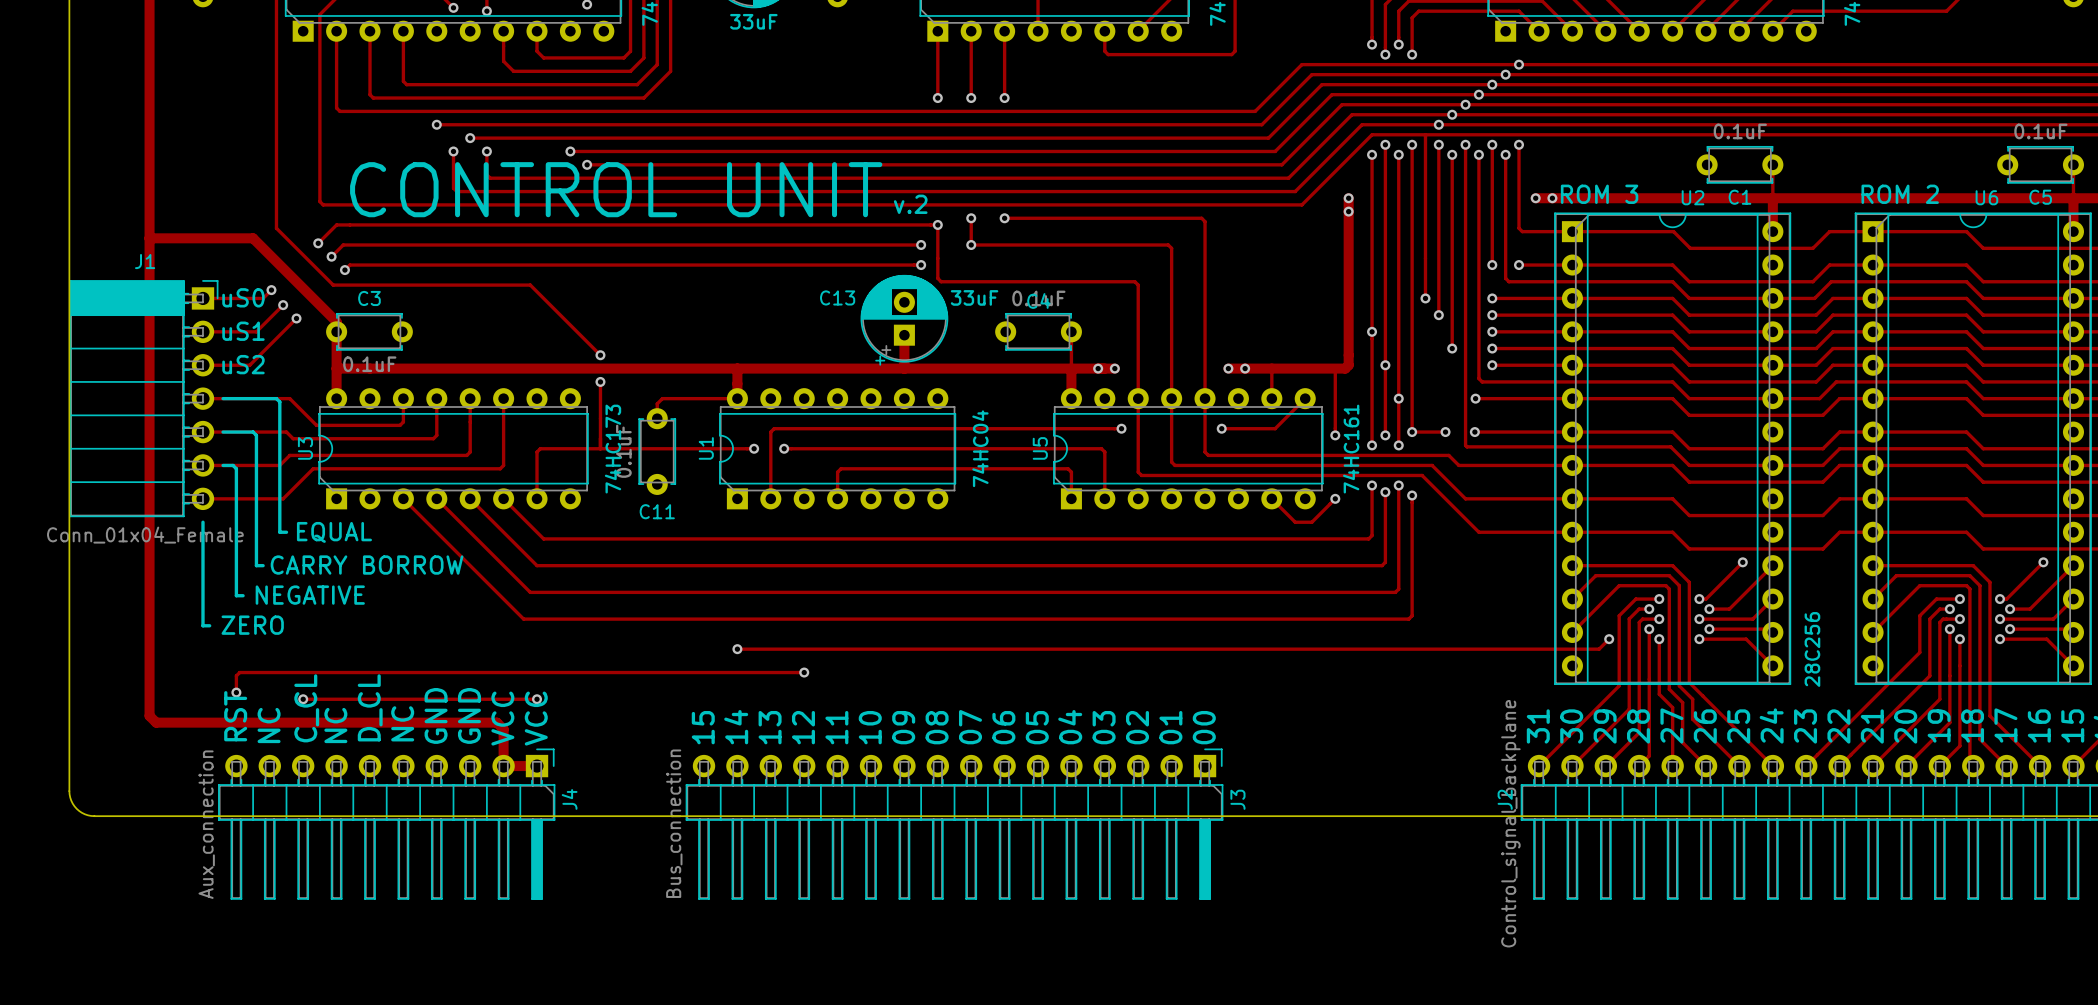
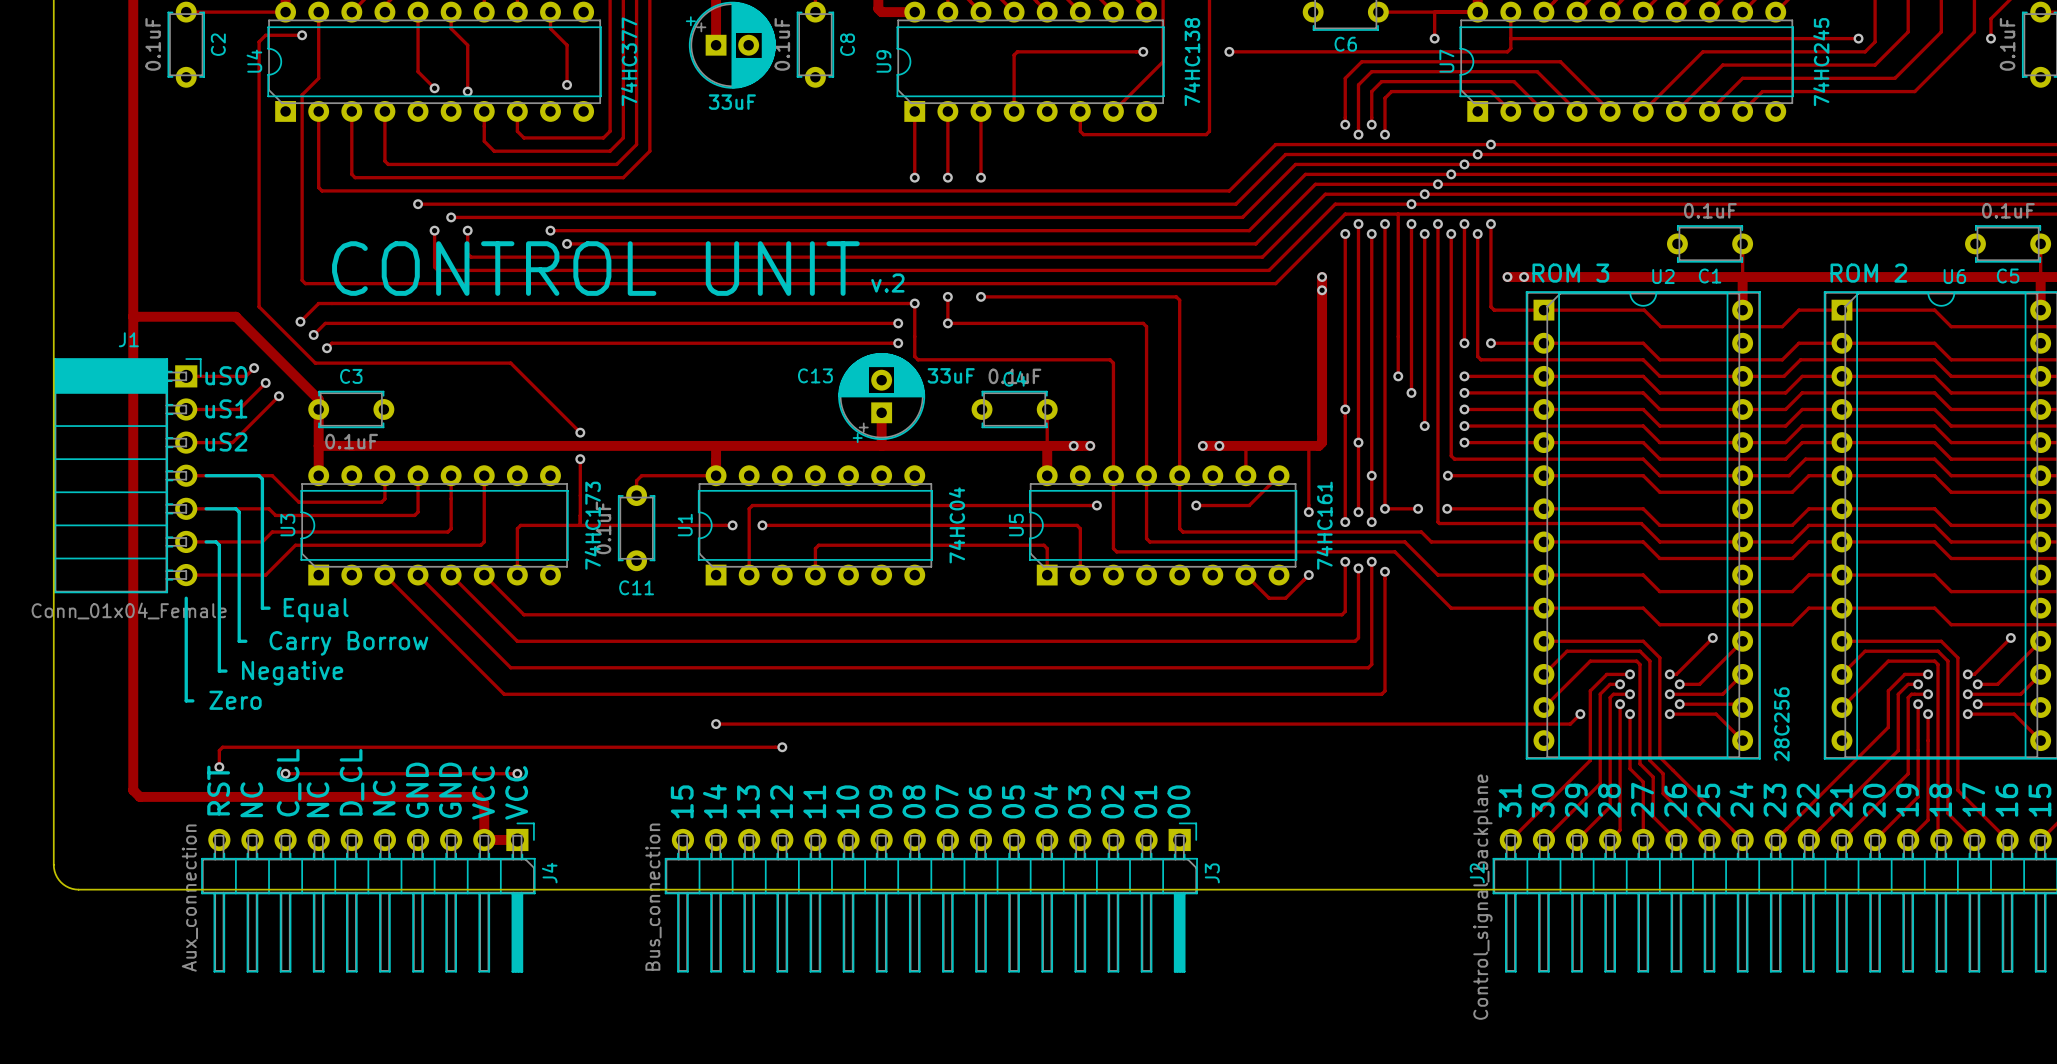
text: EQUAL (334, 532) -> Equal (316, 610)
text: CARRY BORROW (367, 565) -> Carry Borrow (348, 643)
text: NEGATIVE (310, 595) -> Negative (292, 673)
text: ZERO (252, 625) -> Zero (235, 700)

